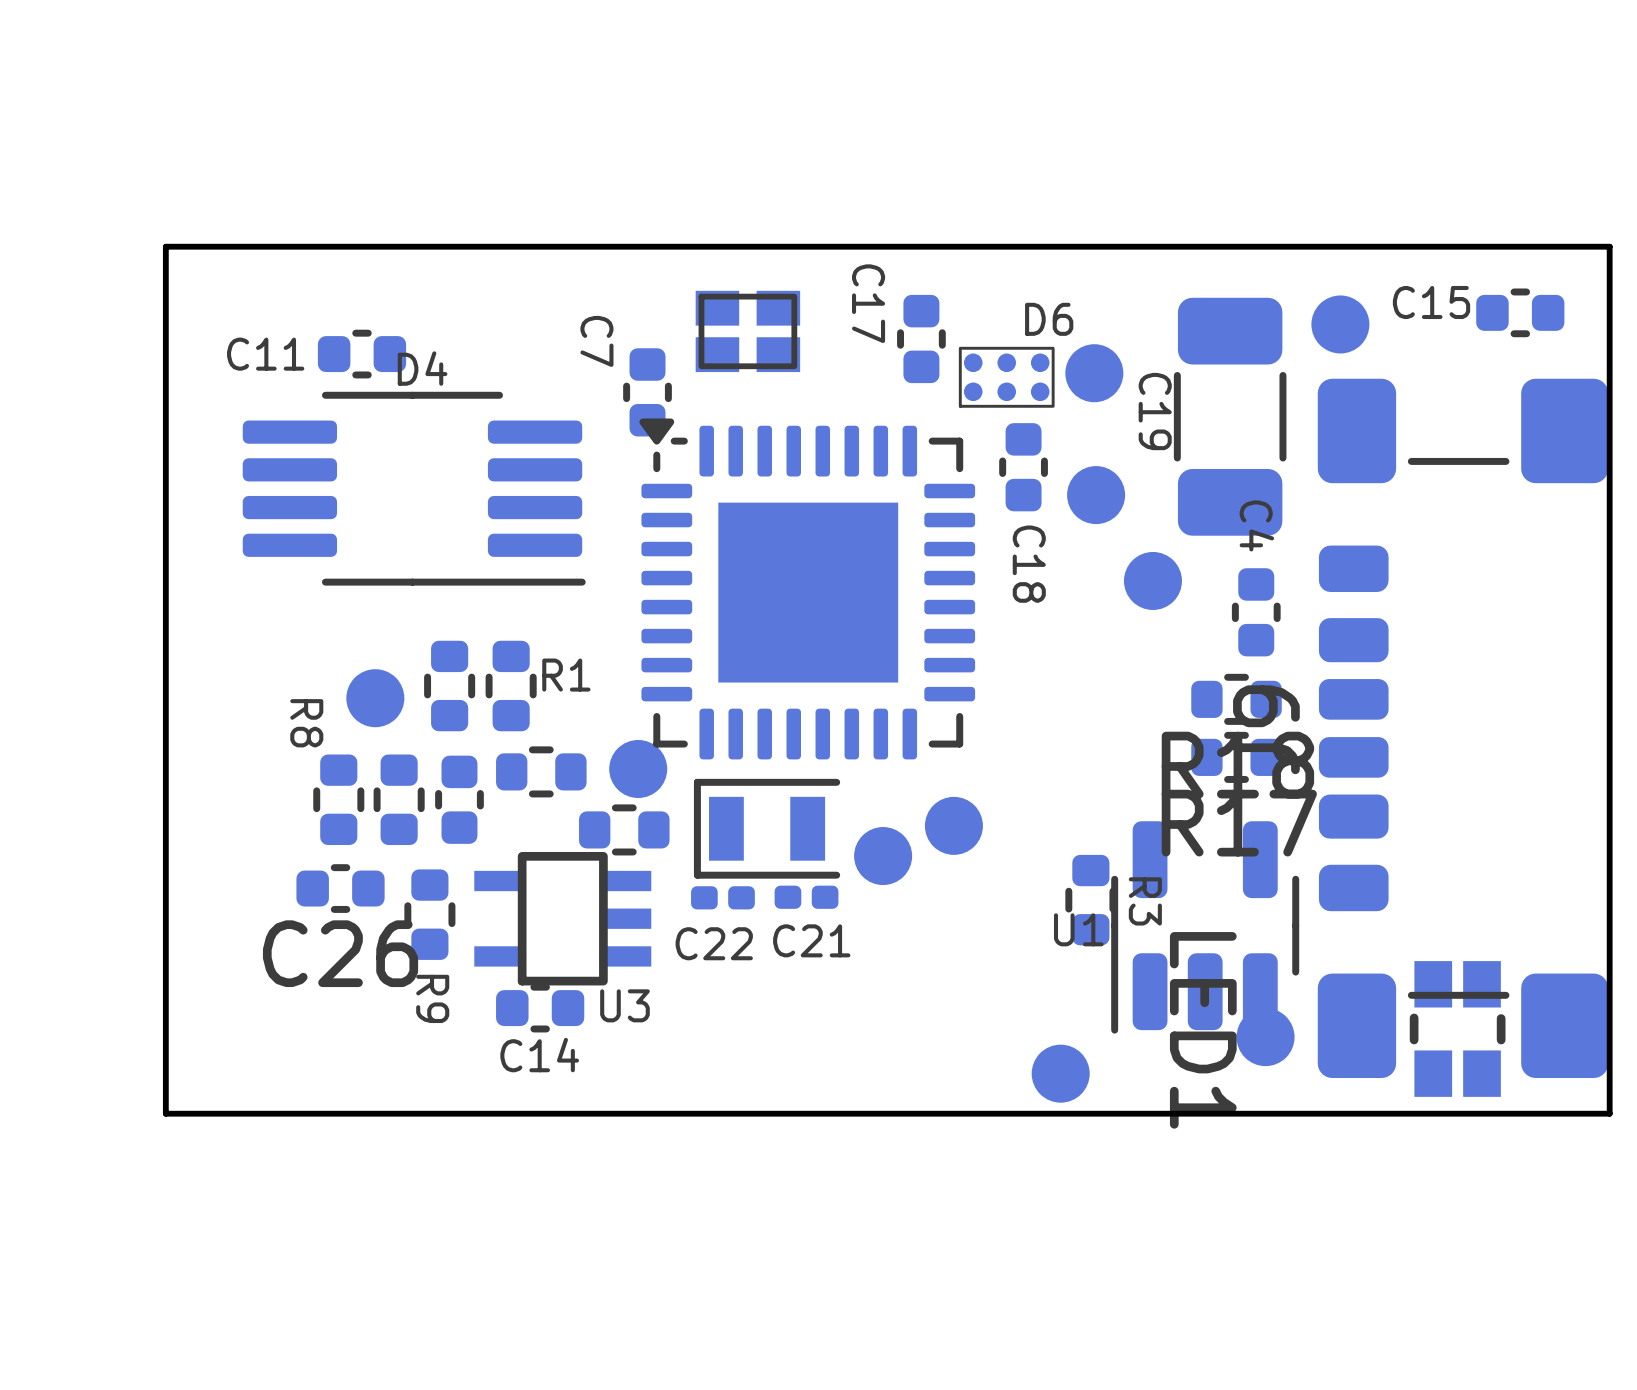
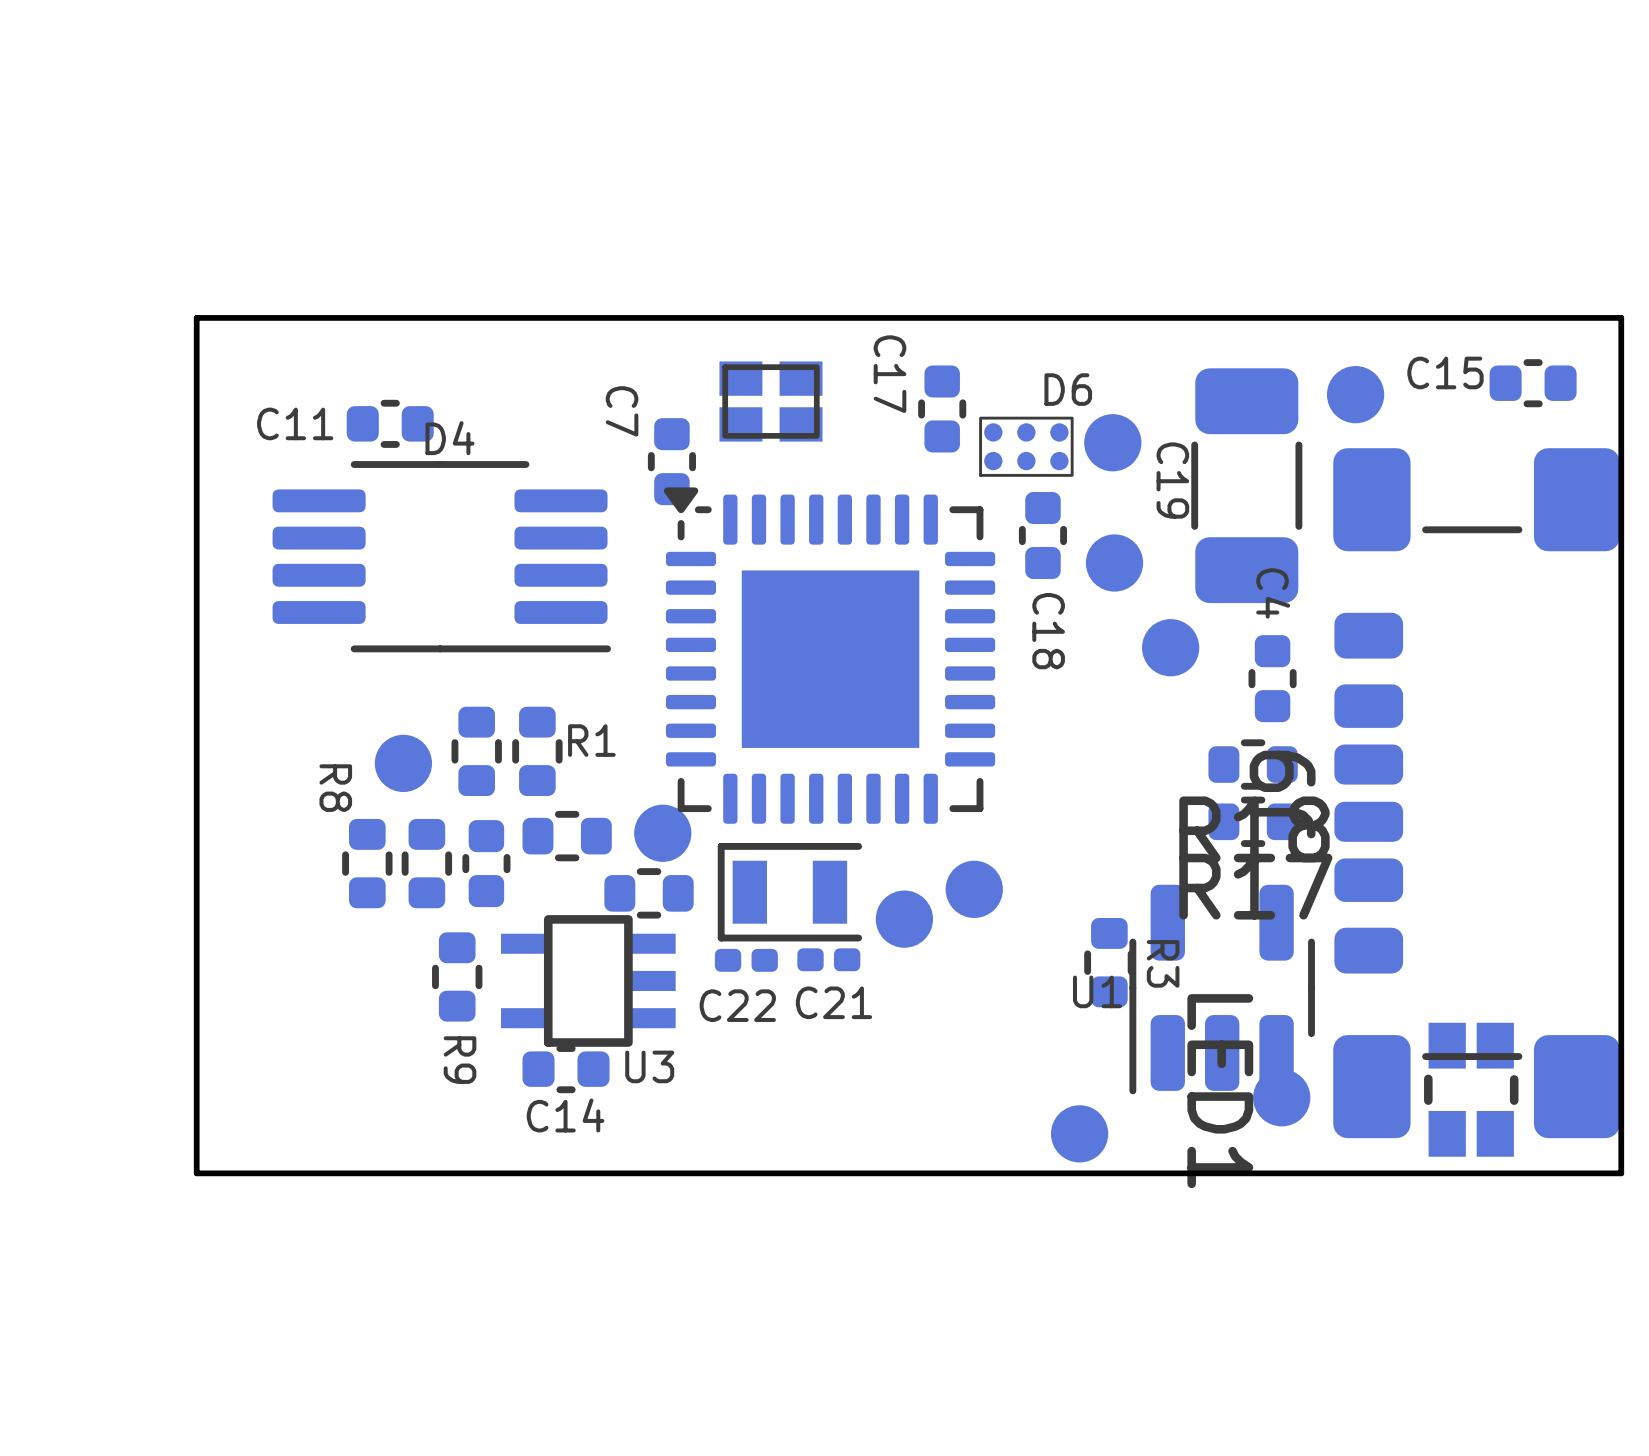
C26: (340, 888) -> none

